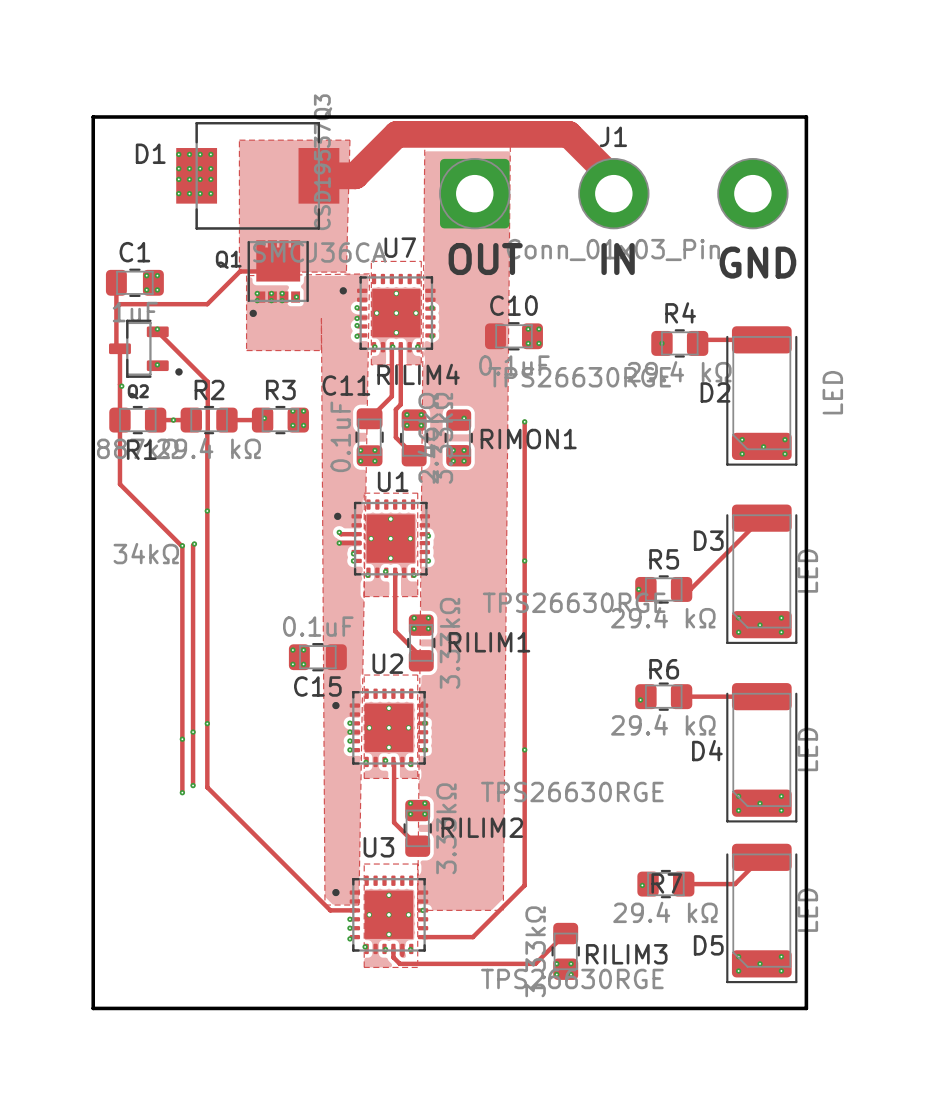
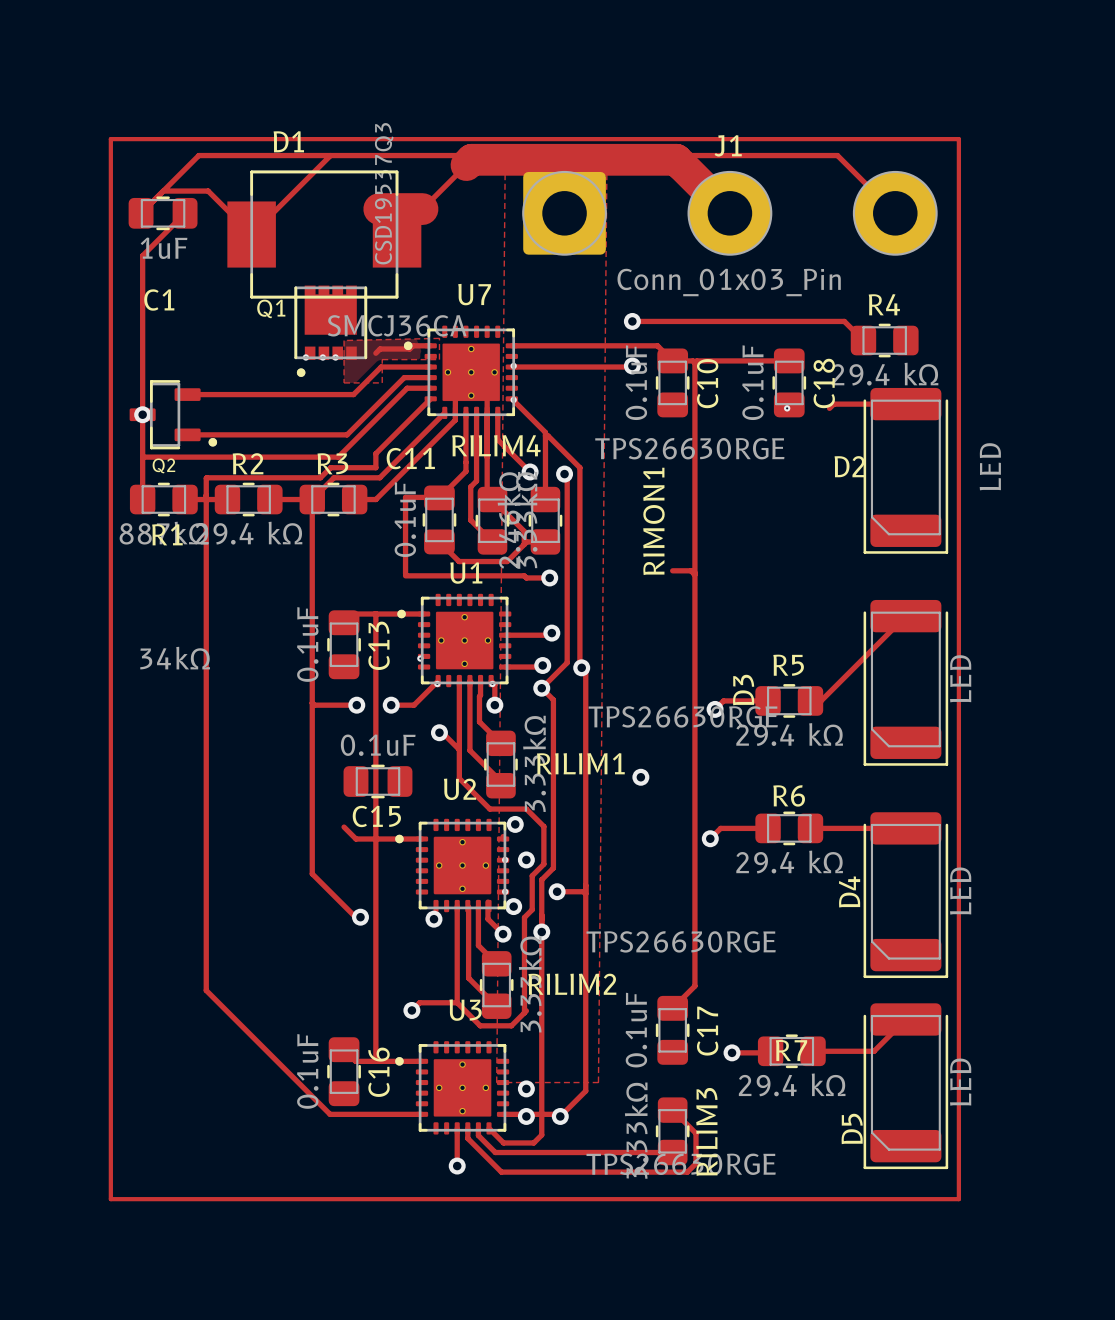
board edge: (93, 116) (806, 116) (806, 1008) (93, 1008) (93, 116) -> none
track: none -> (110, 139) (958, 139) (958, 1199) (110, 1199) (110, 139)
track: none -> (330, 155) (251, 234) (208, 191) (163, 191)
track width: thick (392, 138) (355, 175) -> thin (466, 165) (422, 209)
zone outline: (239, 140) (239, 272) (346, 272) (349, 140) (239, 140) -> none
D1 name position: D1 (150, 153) -> D1 (288, 141)
via: (178, 154) -> none
via: (189, 154) -> none
via: (200, 154) -> none
via: (210, 154) -> none
via: (178, 168) -> none
via: (189, 168) -> none
via: (200, 168) -> none
via: (210, 168) -> none
D1 position: (257, 175) -> (324, 234)
track: none -> (141, 213) (198, 155) (837, 155) (895, 213)
via: (178, 179) -> none
via: (189, 179) -> none
via: (200, 179) -> none
via: (210, 179) -> none
via: (178, 193) -> none
via: (189, 193) -> none
via: (200, 193) -> none
via: (210, 193) -> none
J1 position: (613, 193) -> (729, 213)
text: OUT (485, 259) -> none
text: IN (618, 259) -> none
zone outline: (371, 261) (371, 364) (421, 364) (421, 261) (371, 261) -> none
text: GND (757, 262) -> none
track: none -> (632, 321) (844, 321) (863, 340)
via: none -> (632, 321)
track: (278, 271) (240, 271) (207, 304) (119, 304) (116, 307) -> none
via: (146, 275) -> none
via: (157, 275) -> none
track: (116, 282) (116, 345) (119, 348) -> (185, 213) (142, 255) (142, 414)
C1 position: (134, 282) -> (163, 213)
via: (146, 289) -> none
via: (157, 289) -> none
track: none -> (430, 345) (412, 345) (409, 349) (380, 349) (375, 353)
track: none -> (511, 345) (657, 345) (672, 360) (693, 360) (694, 362)
via: (257, 293) -> none
via: (271, 293) -> none
via: (282, 293) -> none
via: (296, 297) -> none
track: none -> (789, 360) (696, 360) (694, 362)
track: none -> (694, 362) (693, 573)
via: (357, 307) -> none
track: none -> (632, 365) (511, 367)
via: none -> (632, 365)
track: none -> (430, 367) (381, 367) (353, 394) (187, 394) (189, 392)
track: none -> (430, 377) (404, 377) (347, 434) (187, 434)
zone outline: (321, 318) (325, 905) (358, 905) (369, 273) (246, 275) (246, 350) (321, 350) (321, 322) -> (382, 378) (382, 359) (439, 359) (439, 338) (344, 340) (344, 382) (382, 382)
via: (357, 318) -> none
C18: none -> 0.1uF (789, 382)
via: (357, 325) -> none
track: none -> (430, 388) (407, 388) (338, 457) (142, 457)
via: (157, 329) -> none
via: (528, 329) -> none
via: (538, 329) -> none
track: (157, 331) (207, 381) (207, 787) (330, 910) (354, 910) -> none
track: none -> (430, 398) (375, 453) (375, 467) (330, 467) (320, 477) (206, 478) (206, 990) (330, 1114) (421, 1114)
track: none -> (511, 398) (545, 432) (545, 499)
via: (357, 336) -> none
C10 rotation: 0° (513, 336) -> 90° clockwise (672, 382)
C10 position: (513, 336) -> (672, 382)
via: (528, 343) -> none
via: (538, 343) -> none
R4 position: (679, 343) -> (884, 340)
via: (374, 346) -> none
via: (392, 346) -> none
via: (417, 346) -> none
track: none -> (444, 412) (379, 477) (333, 477) (312, 499) (312, 873) (355, 917) (360, 917)
track: none -> (497, 412) (497, 439) (530, 471)
via: none -> (142, 414)
via: (157, 364) -> none
via: (121, 386) -> none
via: none -> (530, 471)
track: none -> (564, 474) (567, 476) (567, 662) (541, 688) (553, 699) (553, 868) (541, 879) (541, 1135) (533, 1142) (503, 1142) (489, 1128)
via: none -> (564, 474)
via: (292, 411) -> none
via: (303, 411) -> none
via: (407, 414) -> none
via: (421, 414) -> none
via: (264, 418) -> none
track: none -> (441, 497) (405, 497) (405, 573)
via: (464, 418) -> none
track: (119, 420) (119, 484) (182, 545) (182, 792) -> none
via: (173, 420) -> none
track: none -> (354, 499) (375, 499) (455, 420) (455, 397) (467, 385) (475, 385) (487, 397) (487, 494) (524, 531) (524, 544)
track: (524, 421) (524, 885) (492, 917) -> (545, 435) (548, 435) (579, 467) (579, 666) (585, 671) (585, 1091)
via: (524, 421) -> none
via: (292, 425) -> none
via: (303, 425) -> none
via: (407, 425) -> none
via: (421, 425) -> none
RIMON1 name rotation: 0° (528, 439) -> 90° counterclockwise (653, 521)
via: (742, 439) -> none
via: (784, 439) -> none
via: (763, 446) -> none
via: (360, 450) -> none
via: (374, 450) -> none
via: (453, 450) -> none
via: (464, 450) -> none
via: (742, 453) -> none
via: (784, 453) -> none
track: none -> (439, 541) (459, 561) (507, 561) (526, 541) (545, 541)
via: (360, 461) -> none
via: (374, 461) -> none
via: (453, 461) -> none
via: (464, 461) -> none
track: none -> (672, 570) (690, 570) (694, 574) (694, 986) (672, 1008)
track: none -> (405, 575) (524, 575) (526, 577) (549, 577)
via: none -> (549, 577)
zone outline: (364, 493) (364, 596) (417, 596) (417, 493) (364, 493) -> none
via: (207, 511) -> none
track: none -> (375, 613) (375, 1061)
track: none -> (424, 614) (352, 614) (344, 622)
track: (339, 532) (341, 534) (356, 534) -> none
via: (339, 532) -> none
track: none -> (551, 633) (549, 635) (505, 635)
via: none -> (551, 633)
via: (428, 535) -> none
D3 name rotation: 0° (708, 540) -> 90° counterclockwise (743, 690)
D3 name position: D3 (708, 540) -> D3 (743, 690)
C13: none -> 0.1uF (344, 644)
track: (194, 543) (193, 785) -> none
via: (194, 543) -> none
track: (339, 543) (356, 543) -> none
via: (339, 543) -> none
via: (182, 545) -> none
track: none -> (542, 665) (505, 667)
via: none -> (542, 665)
via: (353, 560) -> none
via: (428, 560) -> none
via: (524, 560) -> none
via: none -> (581, 667)
via: (385, 571) -> none
track: none -> (438, 681) (414, 705) (391, 705)
track: none -> (459, 681) (459, 778) (489, 809) (526, 809) (543, 826) (543, 864) (532, 875) (532, 909) (524, 917) (524, 1012)
track: none -> (480, 681) (479, 721) (500, 743)
track: none -> (491, 681) (494, 684) (494, 705)
via: none -> (541, 688)
via: (638, 589) -> none
track: none -> (768, 700) (723, 700) (715, 709)
track: none -> (312, 703) (314, 705) (356, 705)
via: none -> (356, 705)
via: none -> (391, 705)
via: none -> (494, 705)
via: none -> (715, 709)
track: none -> (439, 732) (442, 732) (459, 749)
via: none -> (439, 732)
via: (414, 617) -> none
via: (428, 617) -> none
via: (738, 617) -> none
via: (781, 617) -> none
via: (760, 625) -> none
via: (414, 628) -> none
via: (428, 628) -> none
via: (738, 632) -> none
via: (781, 632) -> none
via: (292, 650) -> none
via: (303, 650) -> none
via: none -> (640, 777)
via: (292, 664) -> none
via: (303, 664) -> none
zone outline: (364, 675) (364, 778) (417, 778) (417, 675) (364, 675) -> none
via: none -> (515, 824)
track: none -> (344, 827) (355, 839) (421, 839)
track: none -> (768, 828) (720, 828) (710, 838)
via: (640, 699) -> none
via: none -> (710, 838)
via: (207, 723) -> none
via: (349, 723) -> none
via: none -> (526, 859)
via: (193, 732) -> none
via: (349, 732) -> none
via: (182, 739) -> none
via: (349, 741) -> none
via: (349, 749) -> none
track: none -> (557, 891) (583, 891) (585, 893)
via: none -> (557, 891)
via: (524, 749) -> none
D4 name rotation: 0° (707, 750) -> 90° counterclockwise (849, 891)
track: none -> (487, 902) (487, 919) (503, 934)
via: (385, 760) -> none
track: none -> (457, 906) (457, 1002)
track: none -> (478, 906) (478, 945) (496, 963)
via: (366, 762) -> none
via: none -> (513, 906)
via: (410, 764) -> none
via: none -> (360, 917)
via: none -> (433, 919)
via: none -> (541, 932)
via: (193, 785) -> none
via: none -> (503, 934)
via: (182, 792) -> none
via: (738, 796) -> none
via: (781, 796) -> none
via: (410, 803) -> none
via: (424, 803) -> none
via: (760, 803) -> none
via: (738, 810) -> none
via: (781, 810) -> none
via: (410, 814) -> none
via: (424, 814) -> none
track: none -> (457, 1002) (480, 1025) (511, 1025) (526, 1010)
track: none -> (457, 1002) (419, 1002) (411, 1010)
U3 name position: U3 (378, 847) -> U3 (465, 1010)
via: none -> (411, 1010)
zone outline: (364, 864) (364, 967) (417, 967) (417, 864) (364, 864) -> none
C17: none -> 0.1uF (672, 1030)
track: none -> (344, 1049) (355, 1061) (421, 1061)
track: none -> (732, 1052) (769, 1052)
via: none -> (732, 1052)
via: (642, 885) -> none
C16: none -> 0.1uF (344, 1071)
via: (423, 910) -> none
via: none -> (526, 1088)
via: (349, 919) -> none
via: (349, 928) -> none
track: (565, 933) (535, 963) (399, 963) -> (672, 1110) (695, 1133) (695, 1163) (687, 1172) (501, 1172) (475, 1146)
via: (349, 938) -> none
via: none -> (526, 1116)
via: none -> (560, 1116)
D5 name rotation: 0° (708, 945) -> 90° counterclockwise (852, 1128)
via: (365, 946) -> none
track: none -> (457, 1128) (457, 1166)
via: (385, 949) -> none
via: (410, 949) -> none
track: none -> (478, 1135) (495, 1152) (672, 1152)
RILIM3 name rotation: 0° (626, 954) -> 90° counterclockwise (706, 1131)
via: (738, 956) -> none
via: (781, 956) -> none
via: (556, 963) -> none
via: (571, 963) -> none
via: (760, 963) -> none
via: (738, 970) -> none
via: (781, 970) -> none
via: (556, 974) -> none
via: (571, 974) -> none
via: none -> (457, 1166)

